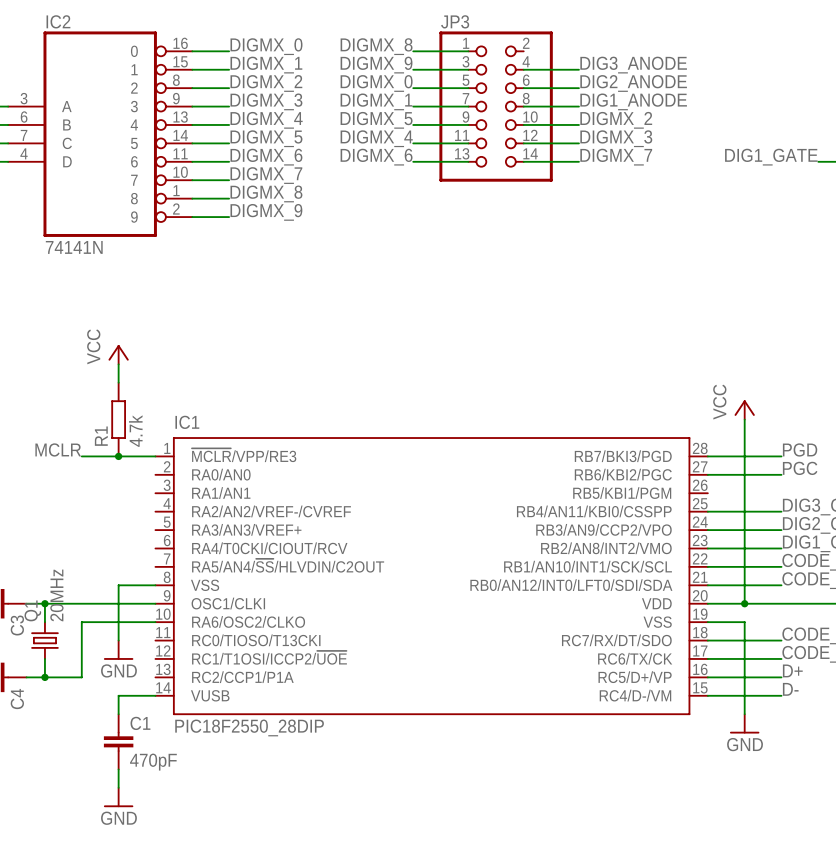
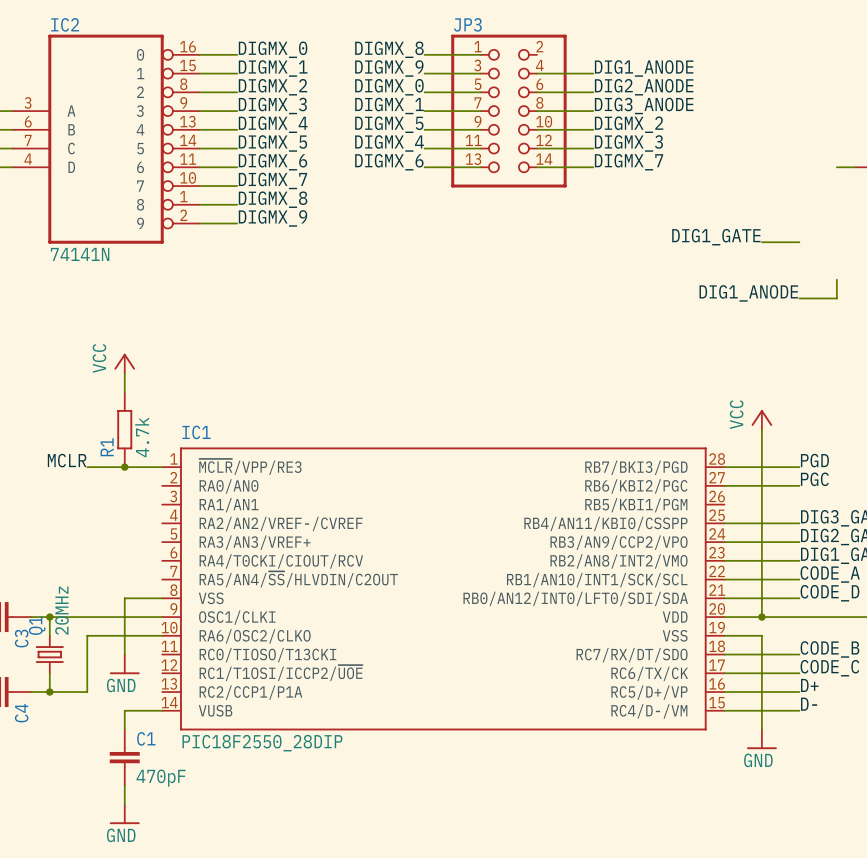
label: DIG3_ANODE (633, 65) -> DIG1_ANODE (644, 68)
label: DIG1_ANODE (633, 101) -> DIG3_ANODE (644, 105)
label position: DIG1_GATE (771, 157) -> DIG1_GATE (716, 237)
wire: none -> (761, 242) (799, 242)
wire: none -> (836, 279) (836, 298) (799, 298)
label: none -> DIG1_ANODE (748, 293)

